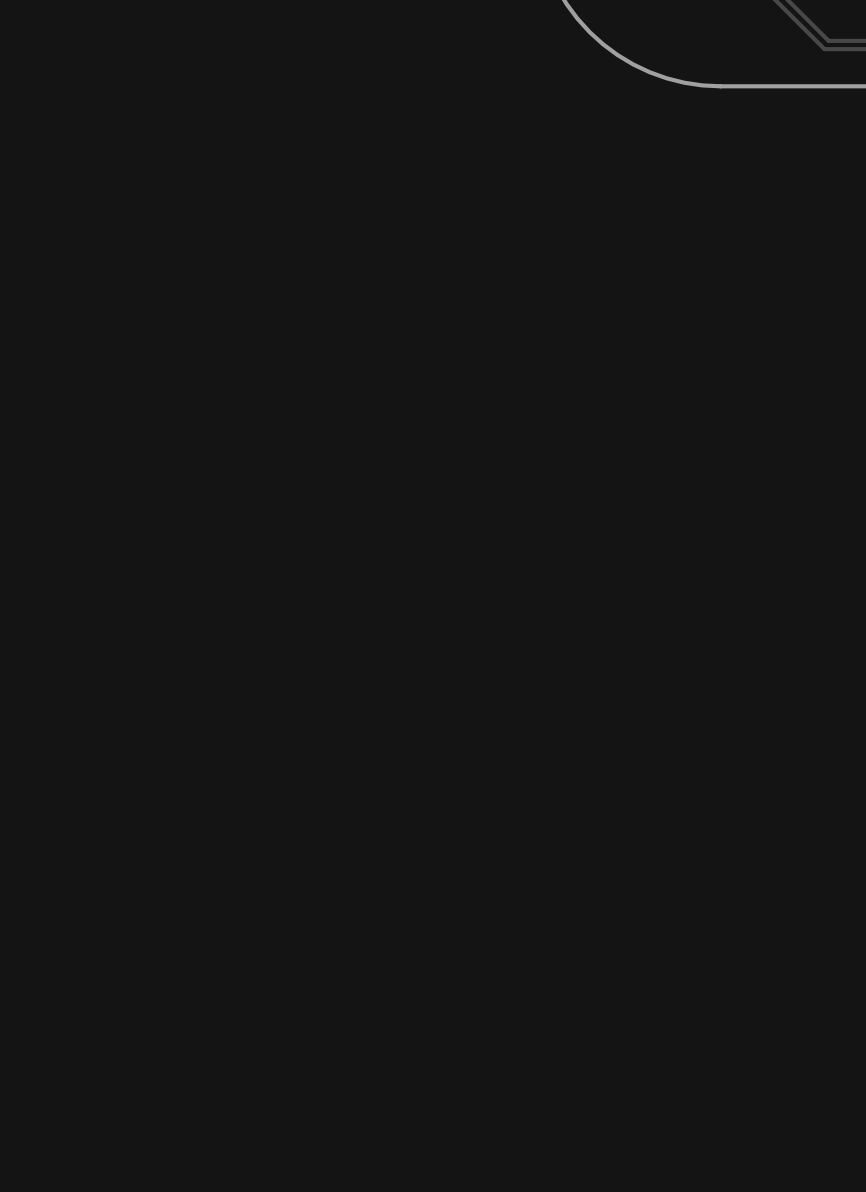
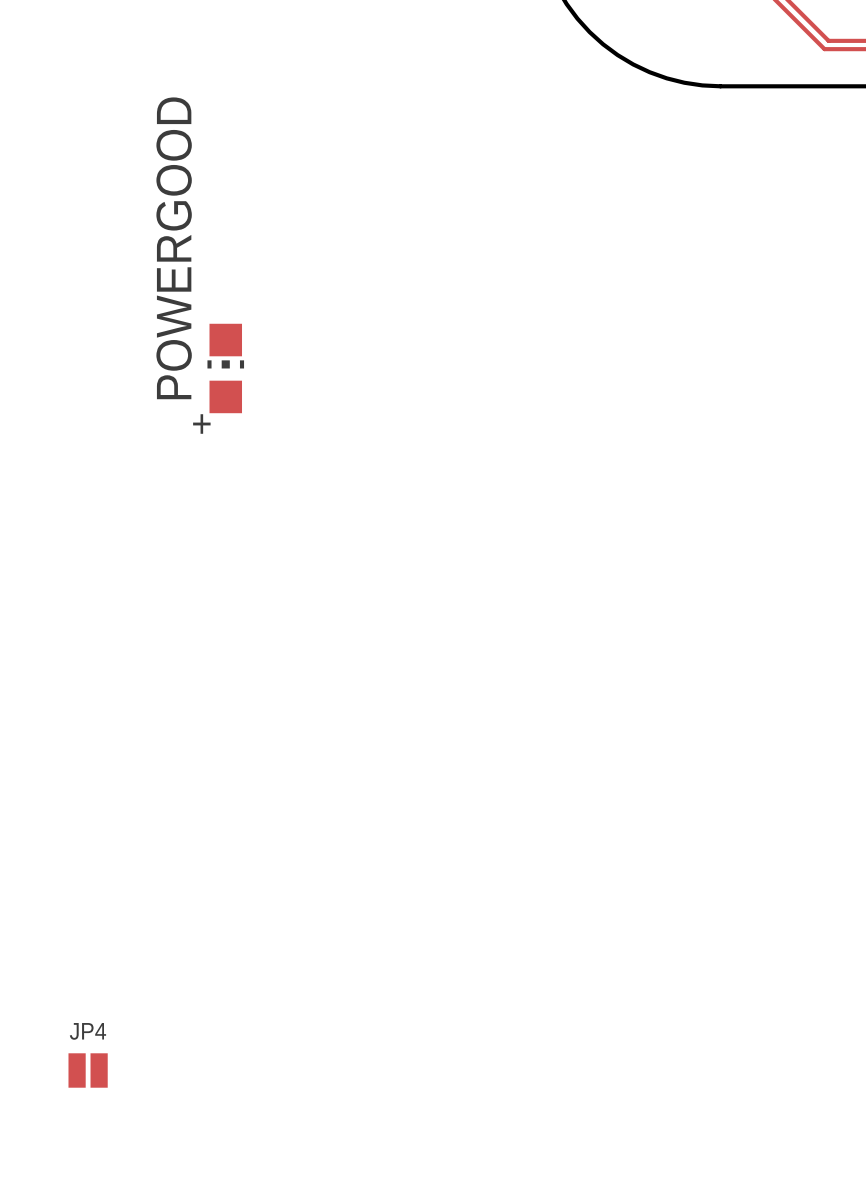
POWERGOOD: none -> (225, 368)
JP4: none -> (88, 1070)

